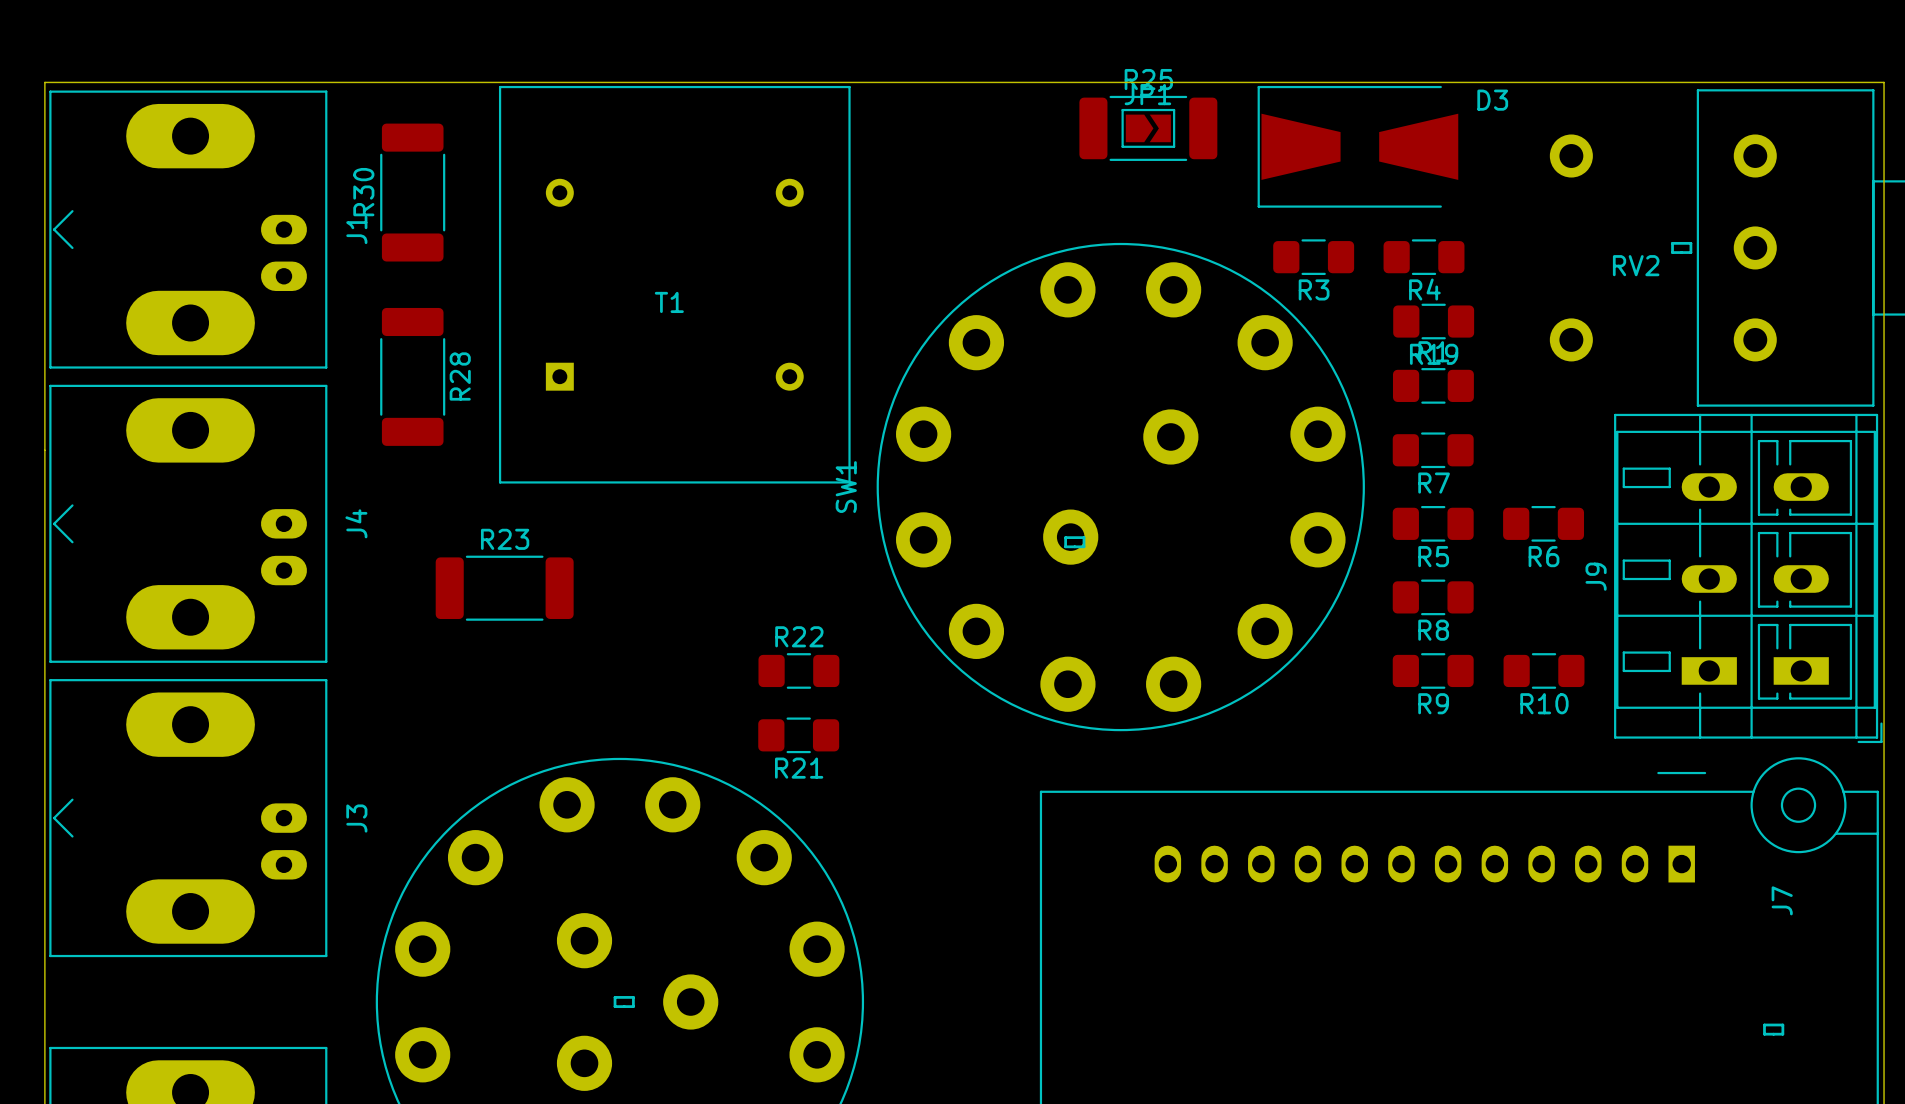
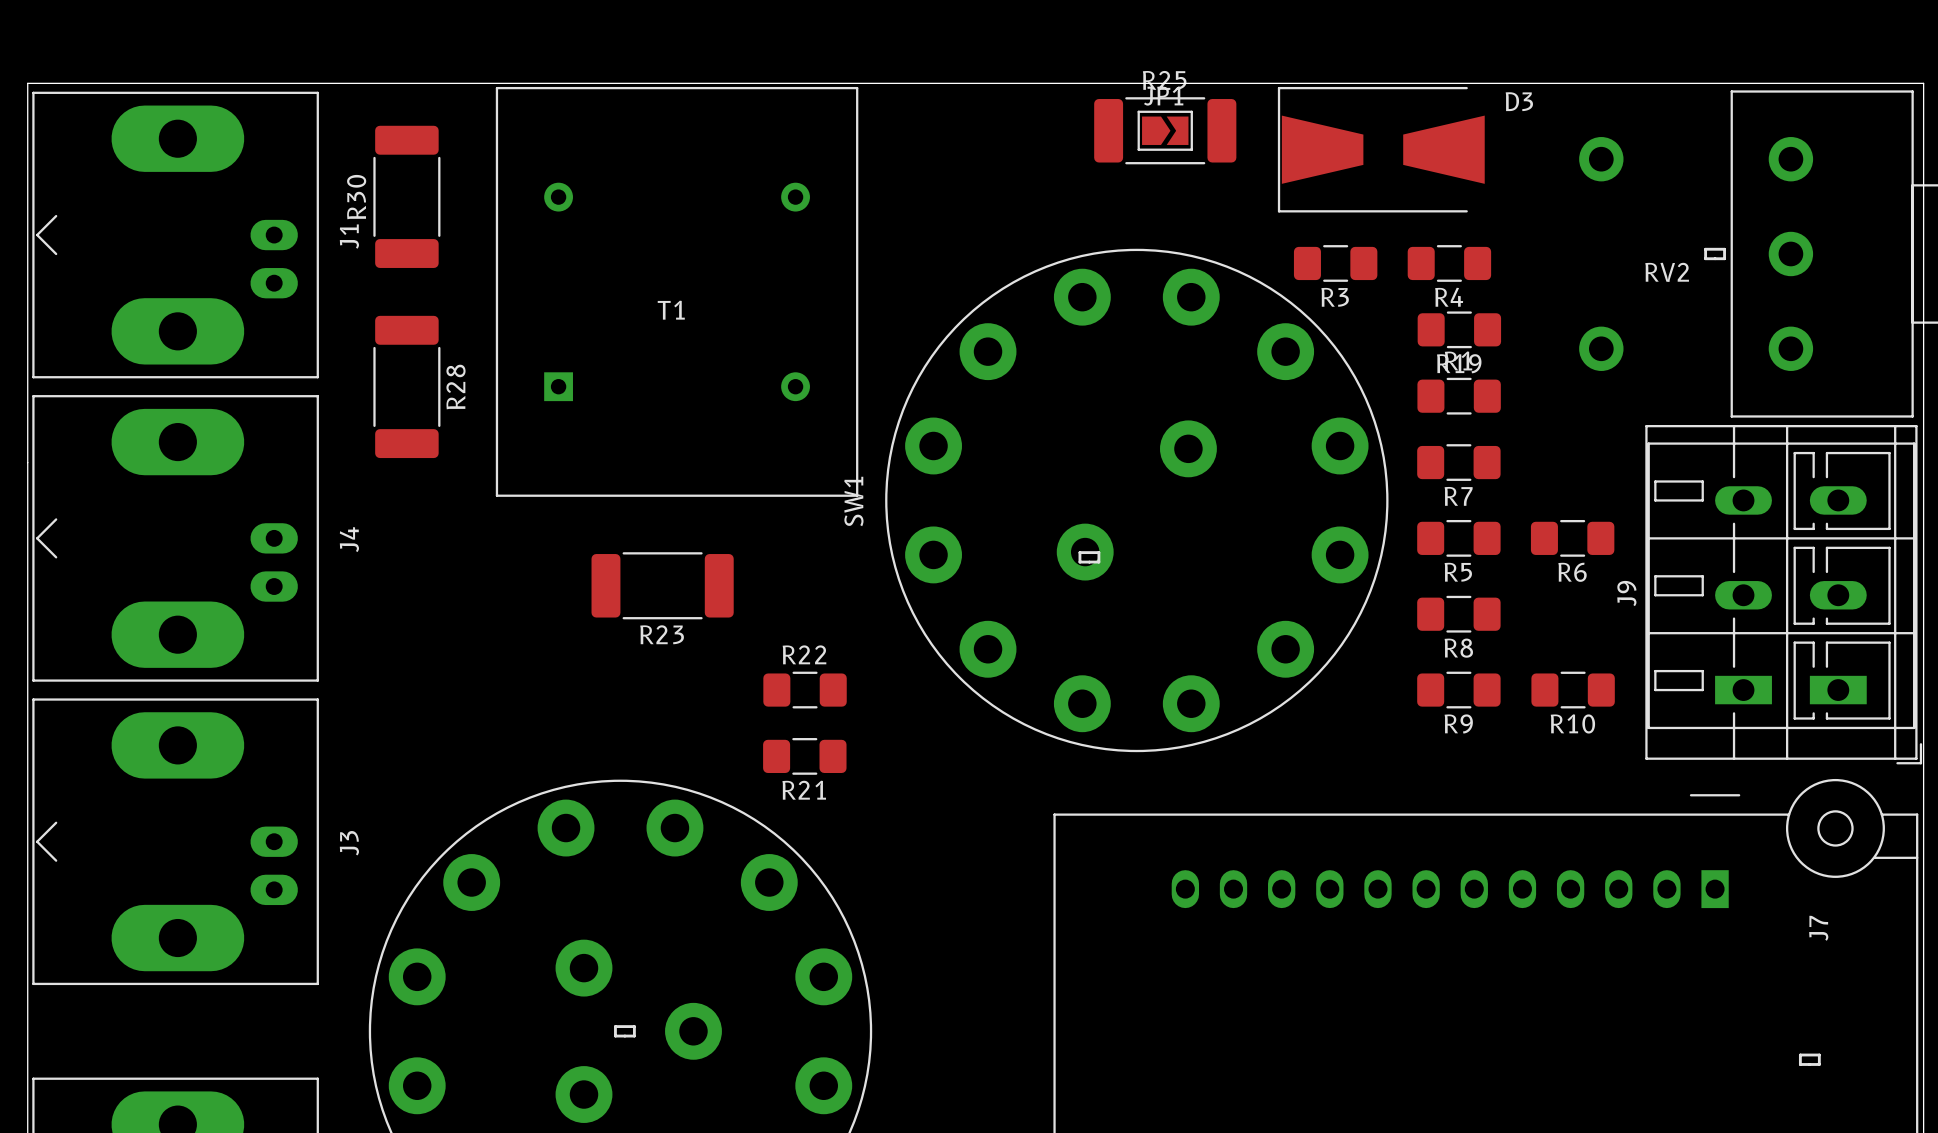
R23 name position: R23 (505, 539) -> R23 (662, 634)
R23 position: (504, 588) -> (662, 585)

